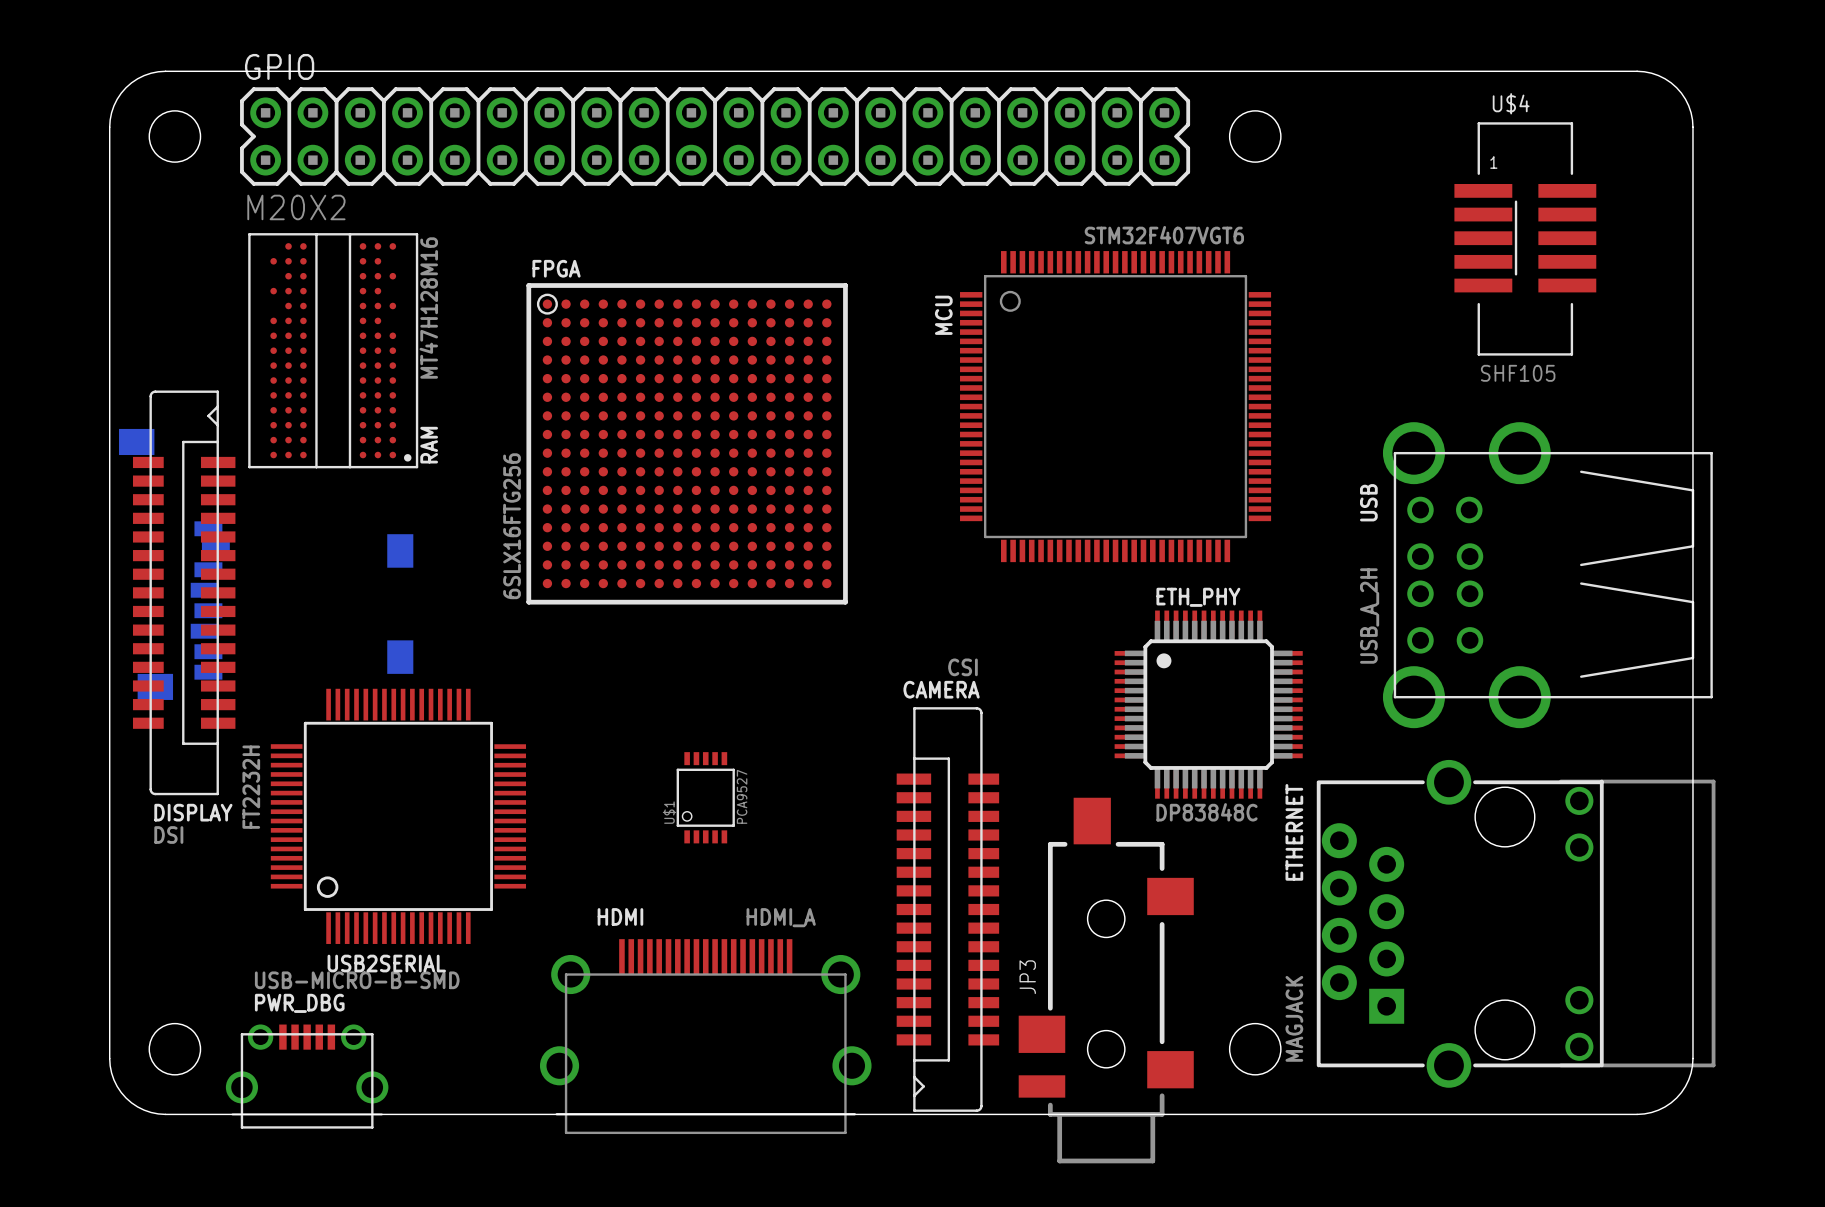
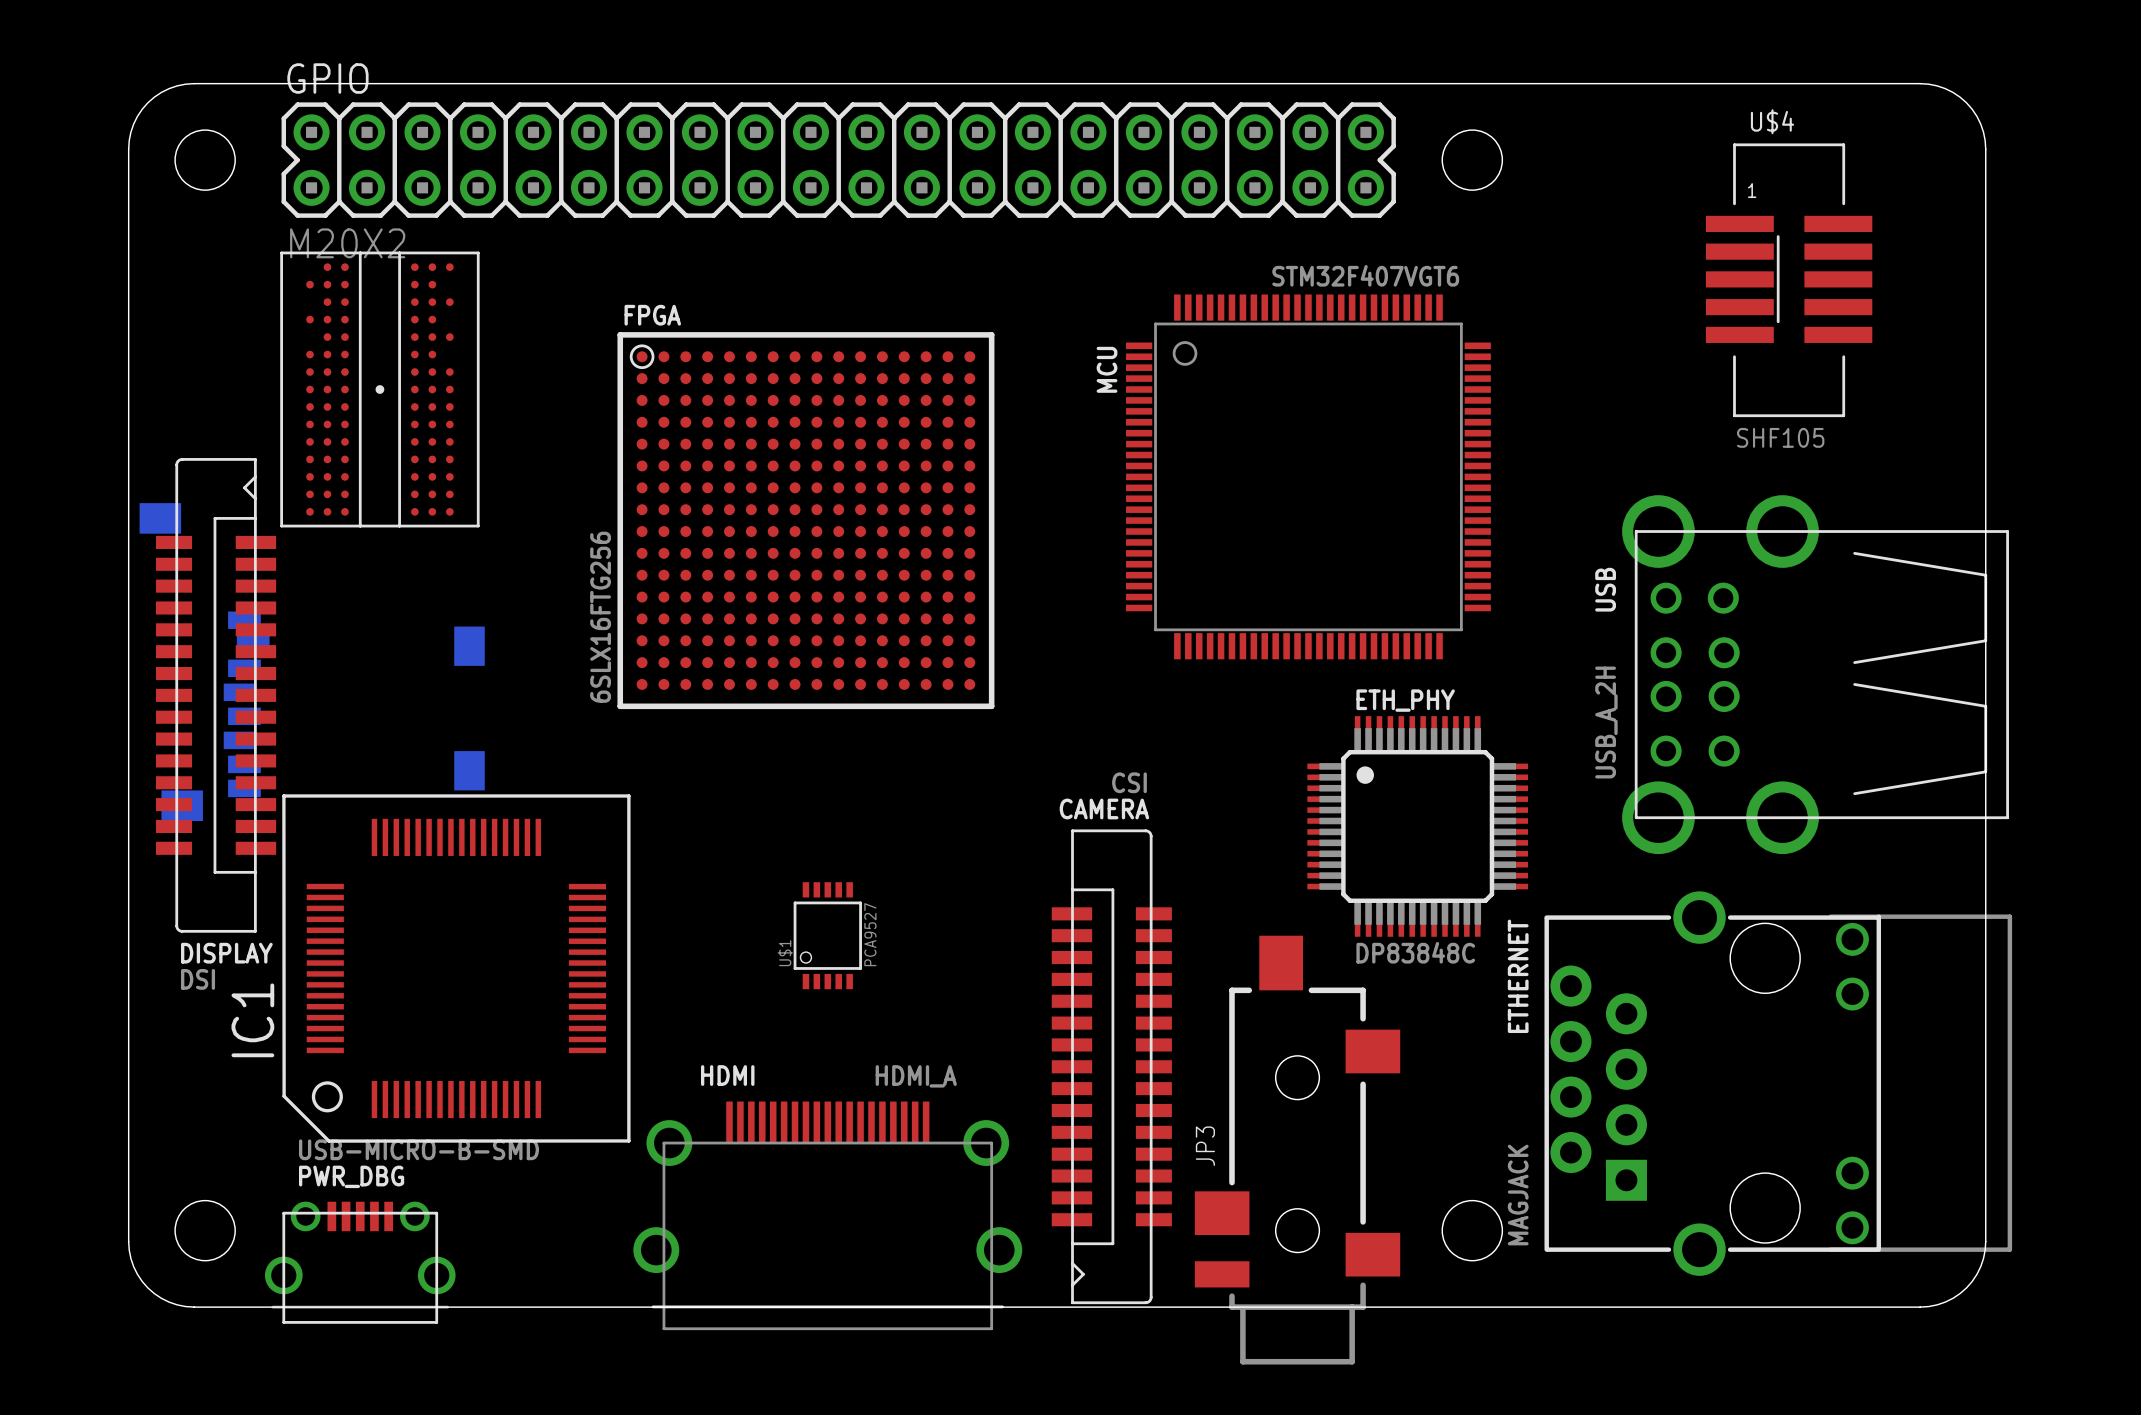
part: none -> (379, 389)
RAM: MT47H128M16 (333, 350) -> none
USB2SERIAL: FT2232H (398, 816) -> none
IC1: none -> (456, 968)

